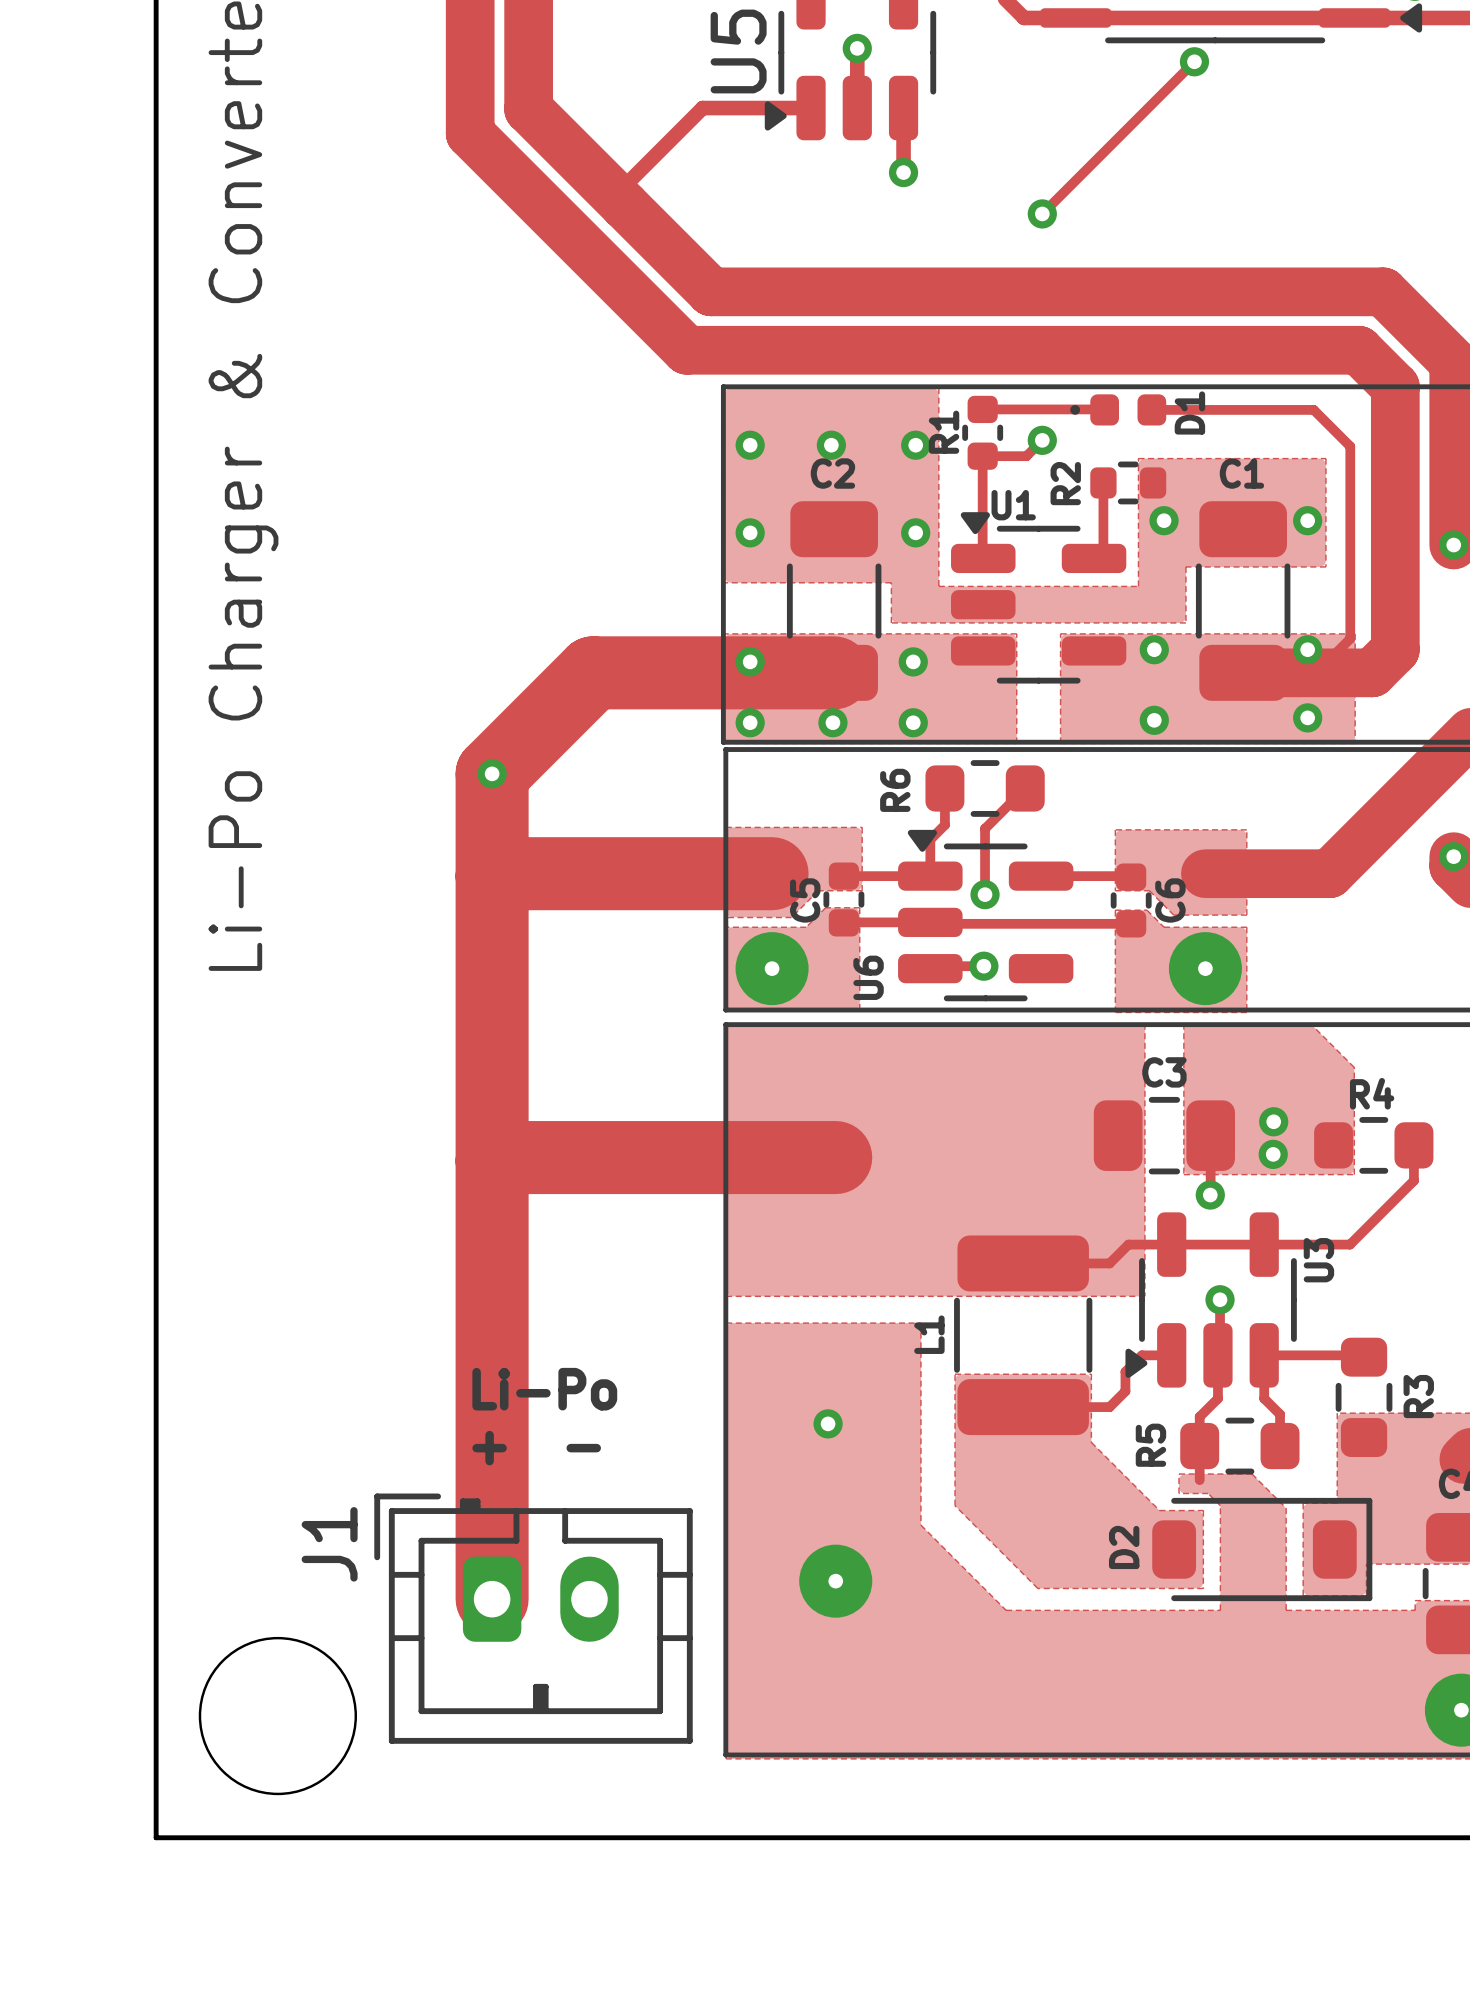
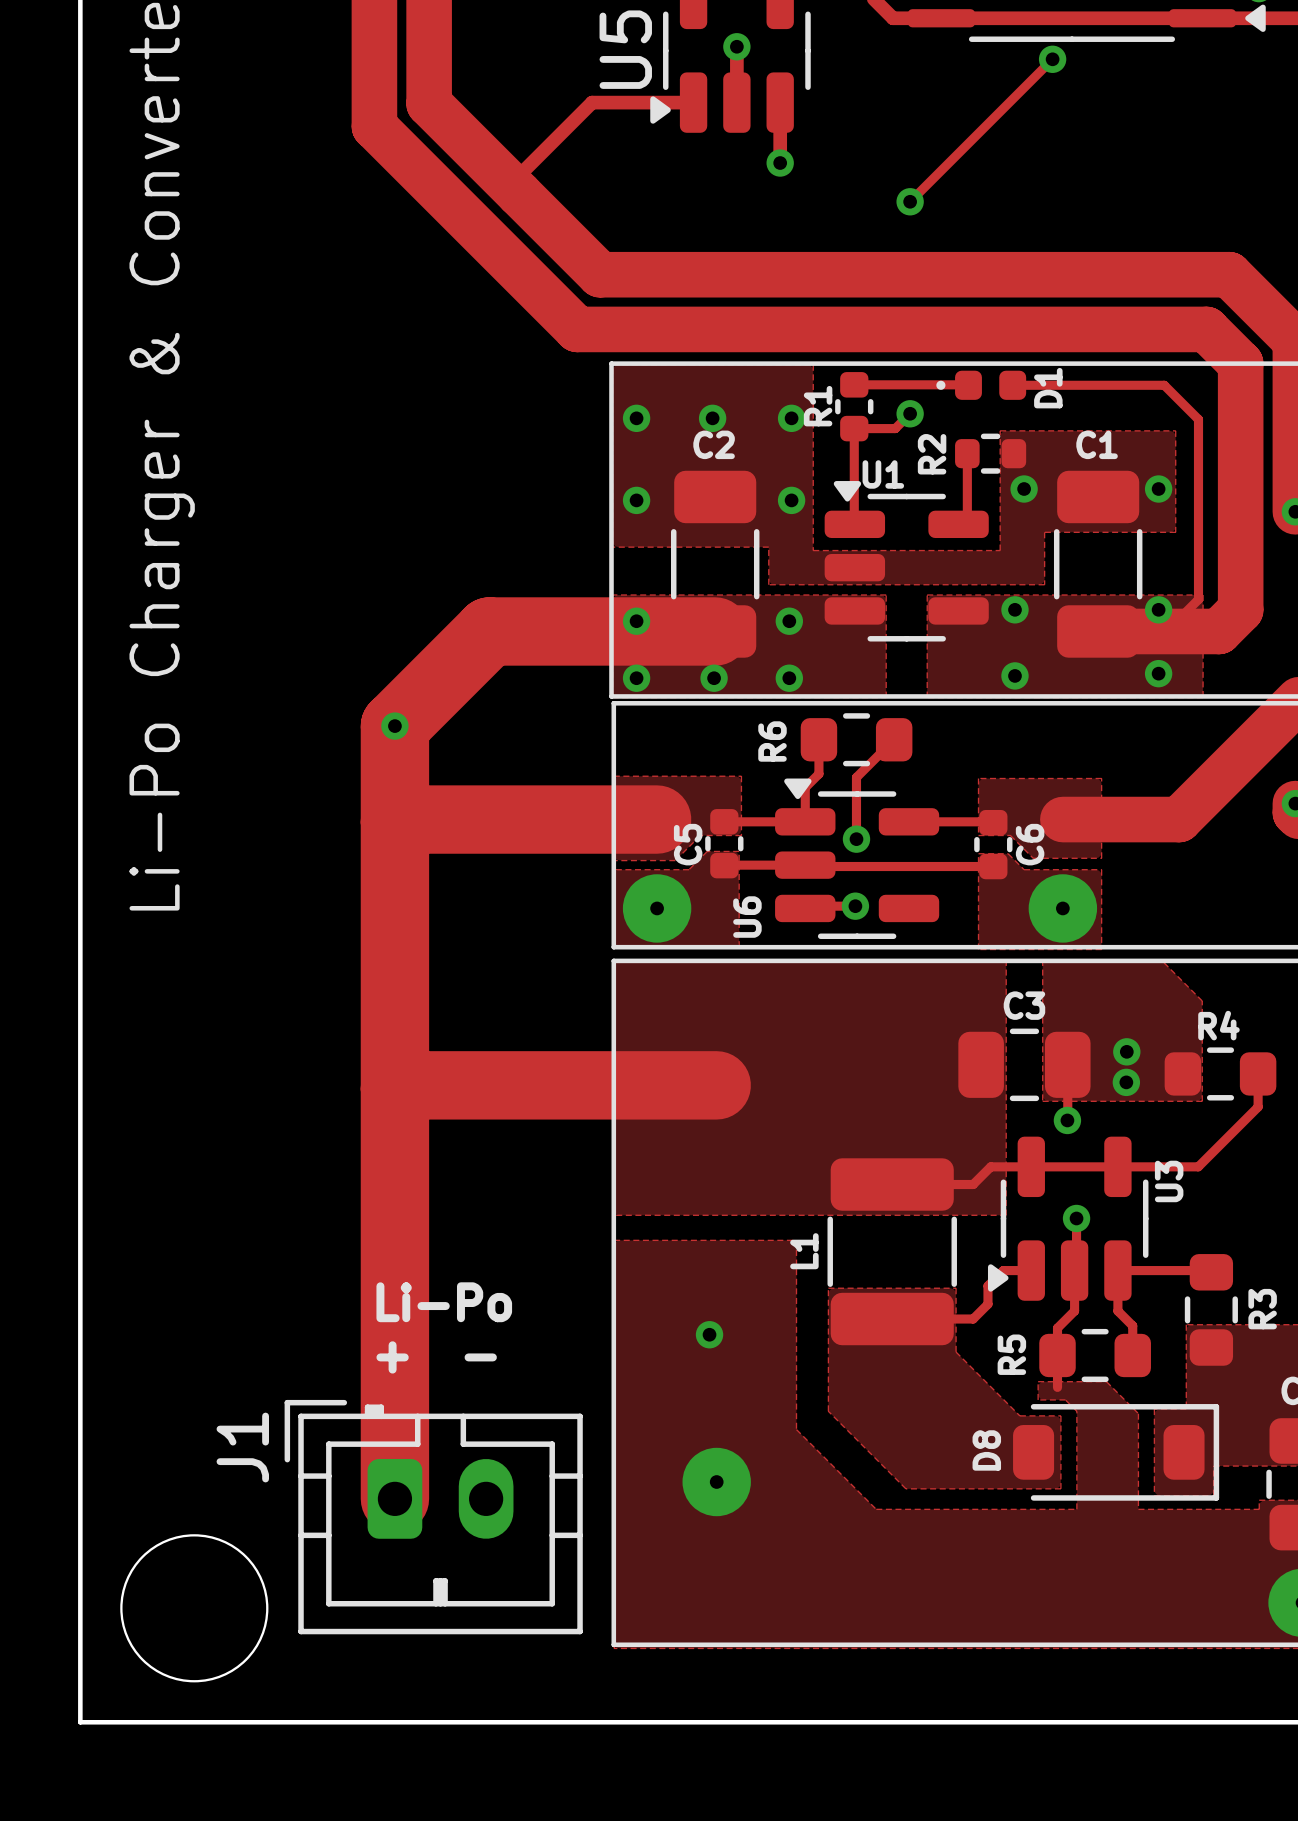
D2 name: D2 (1124, 1547) -> D8 (986, 1450)

